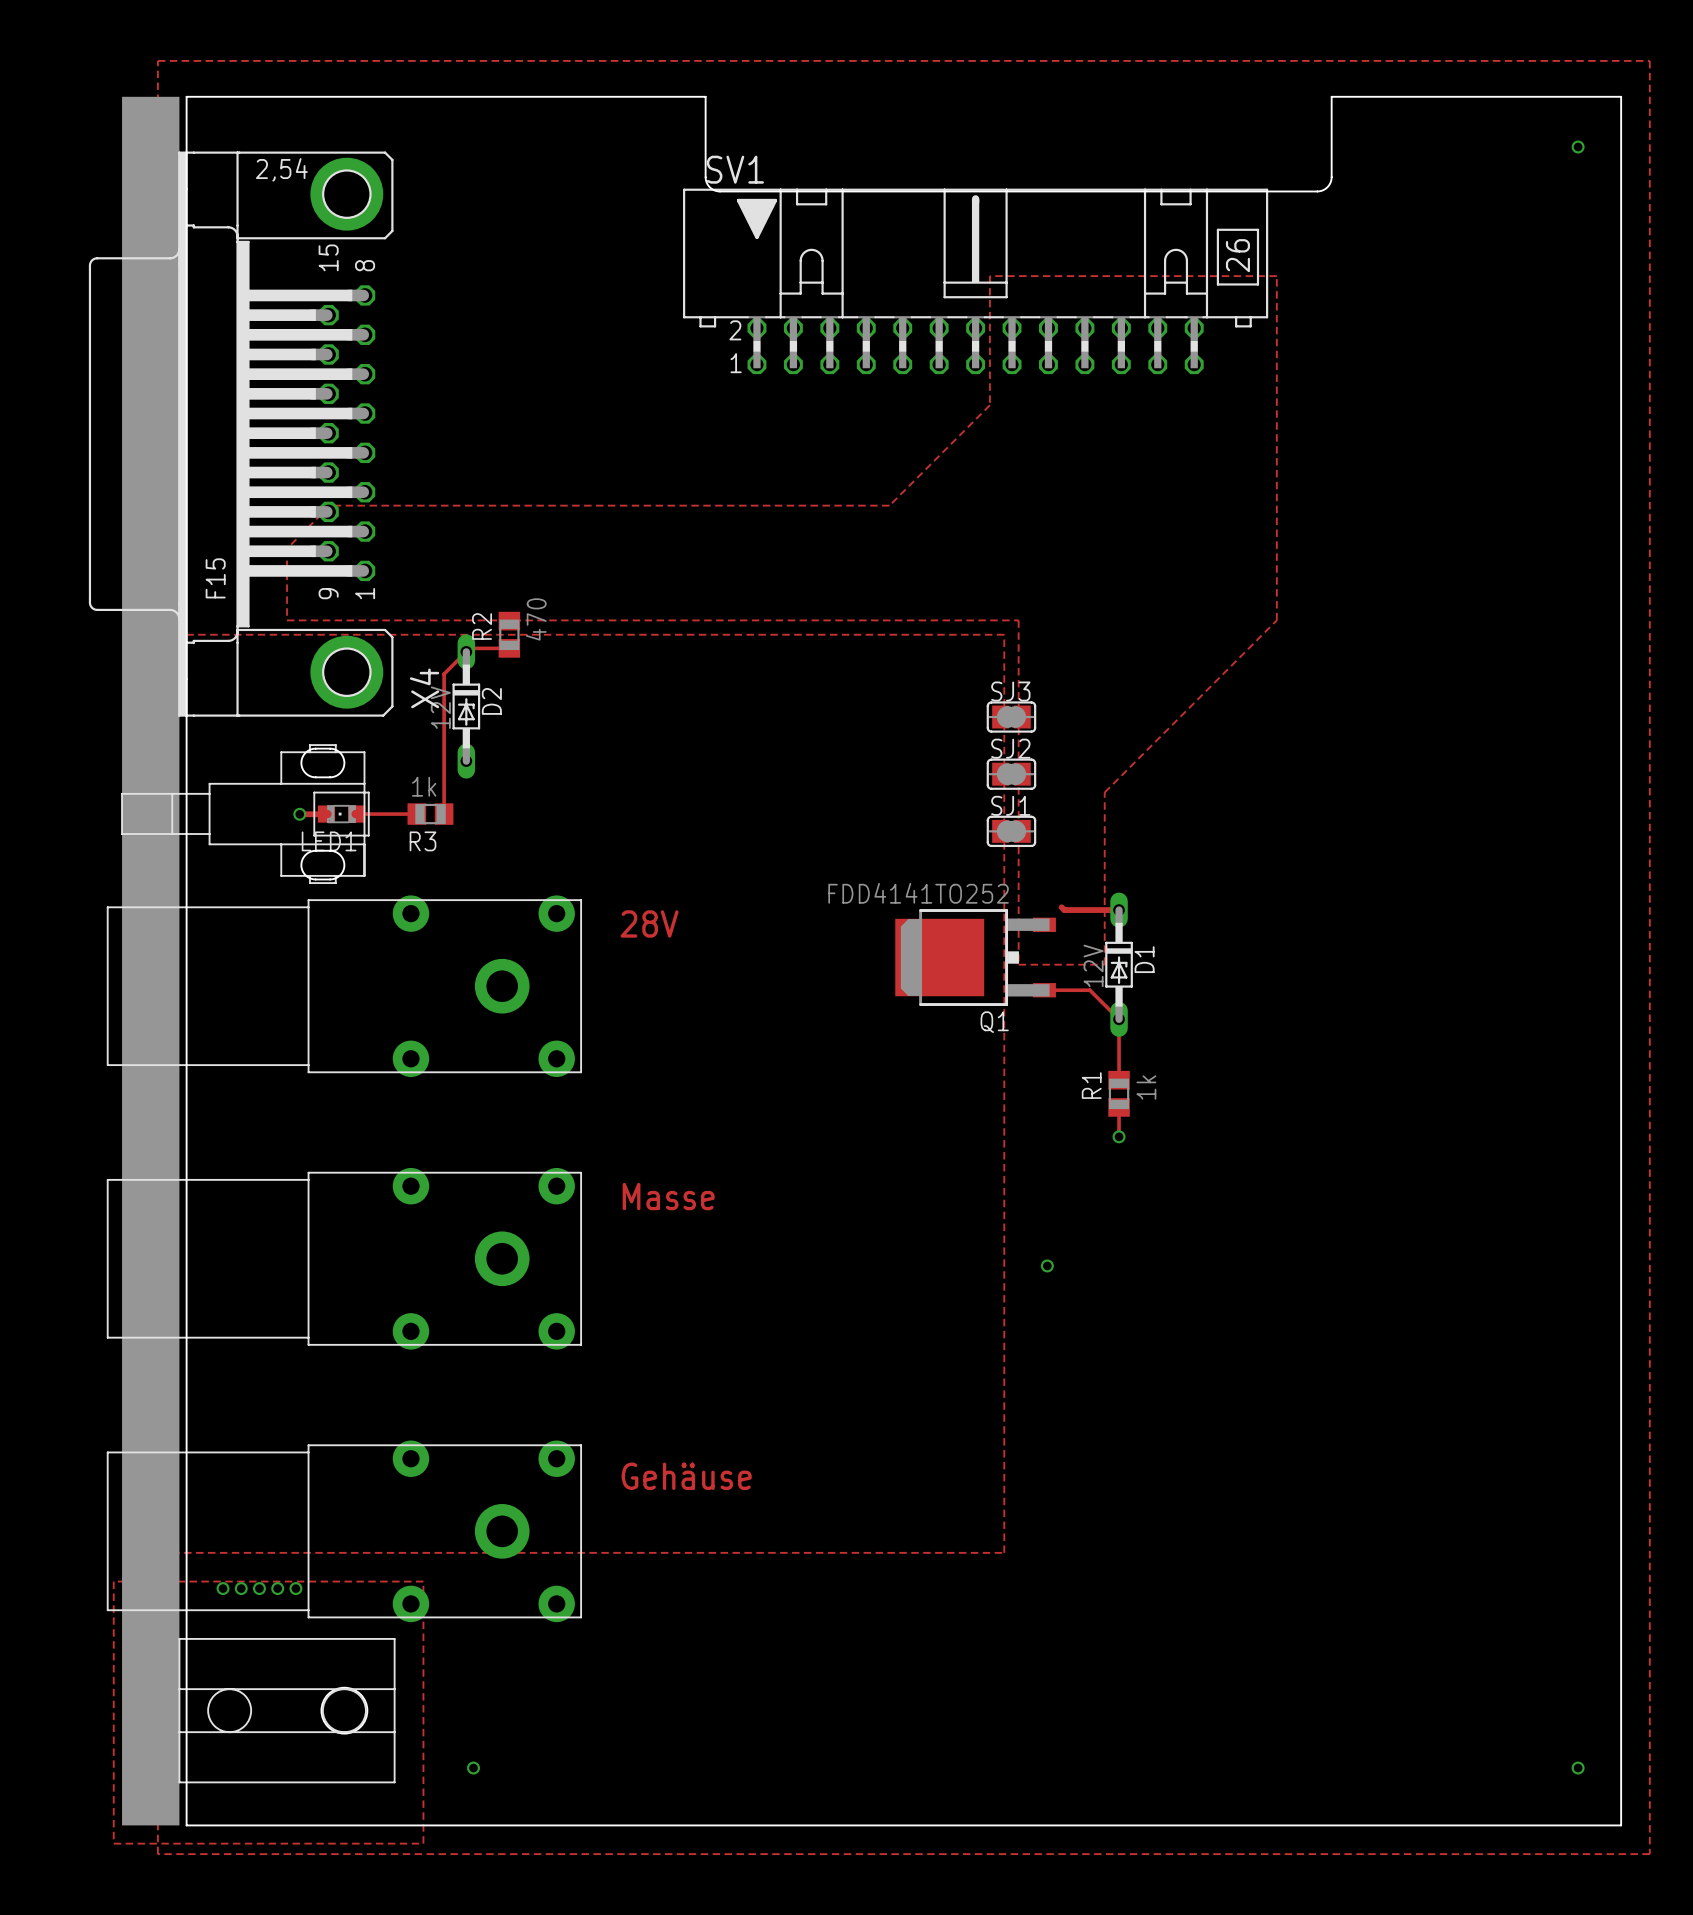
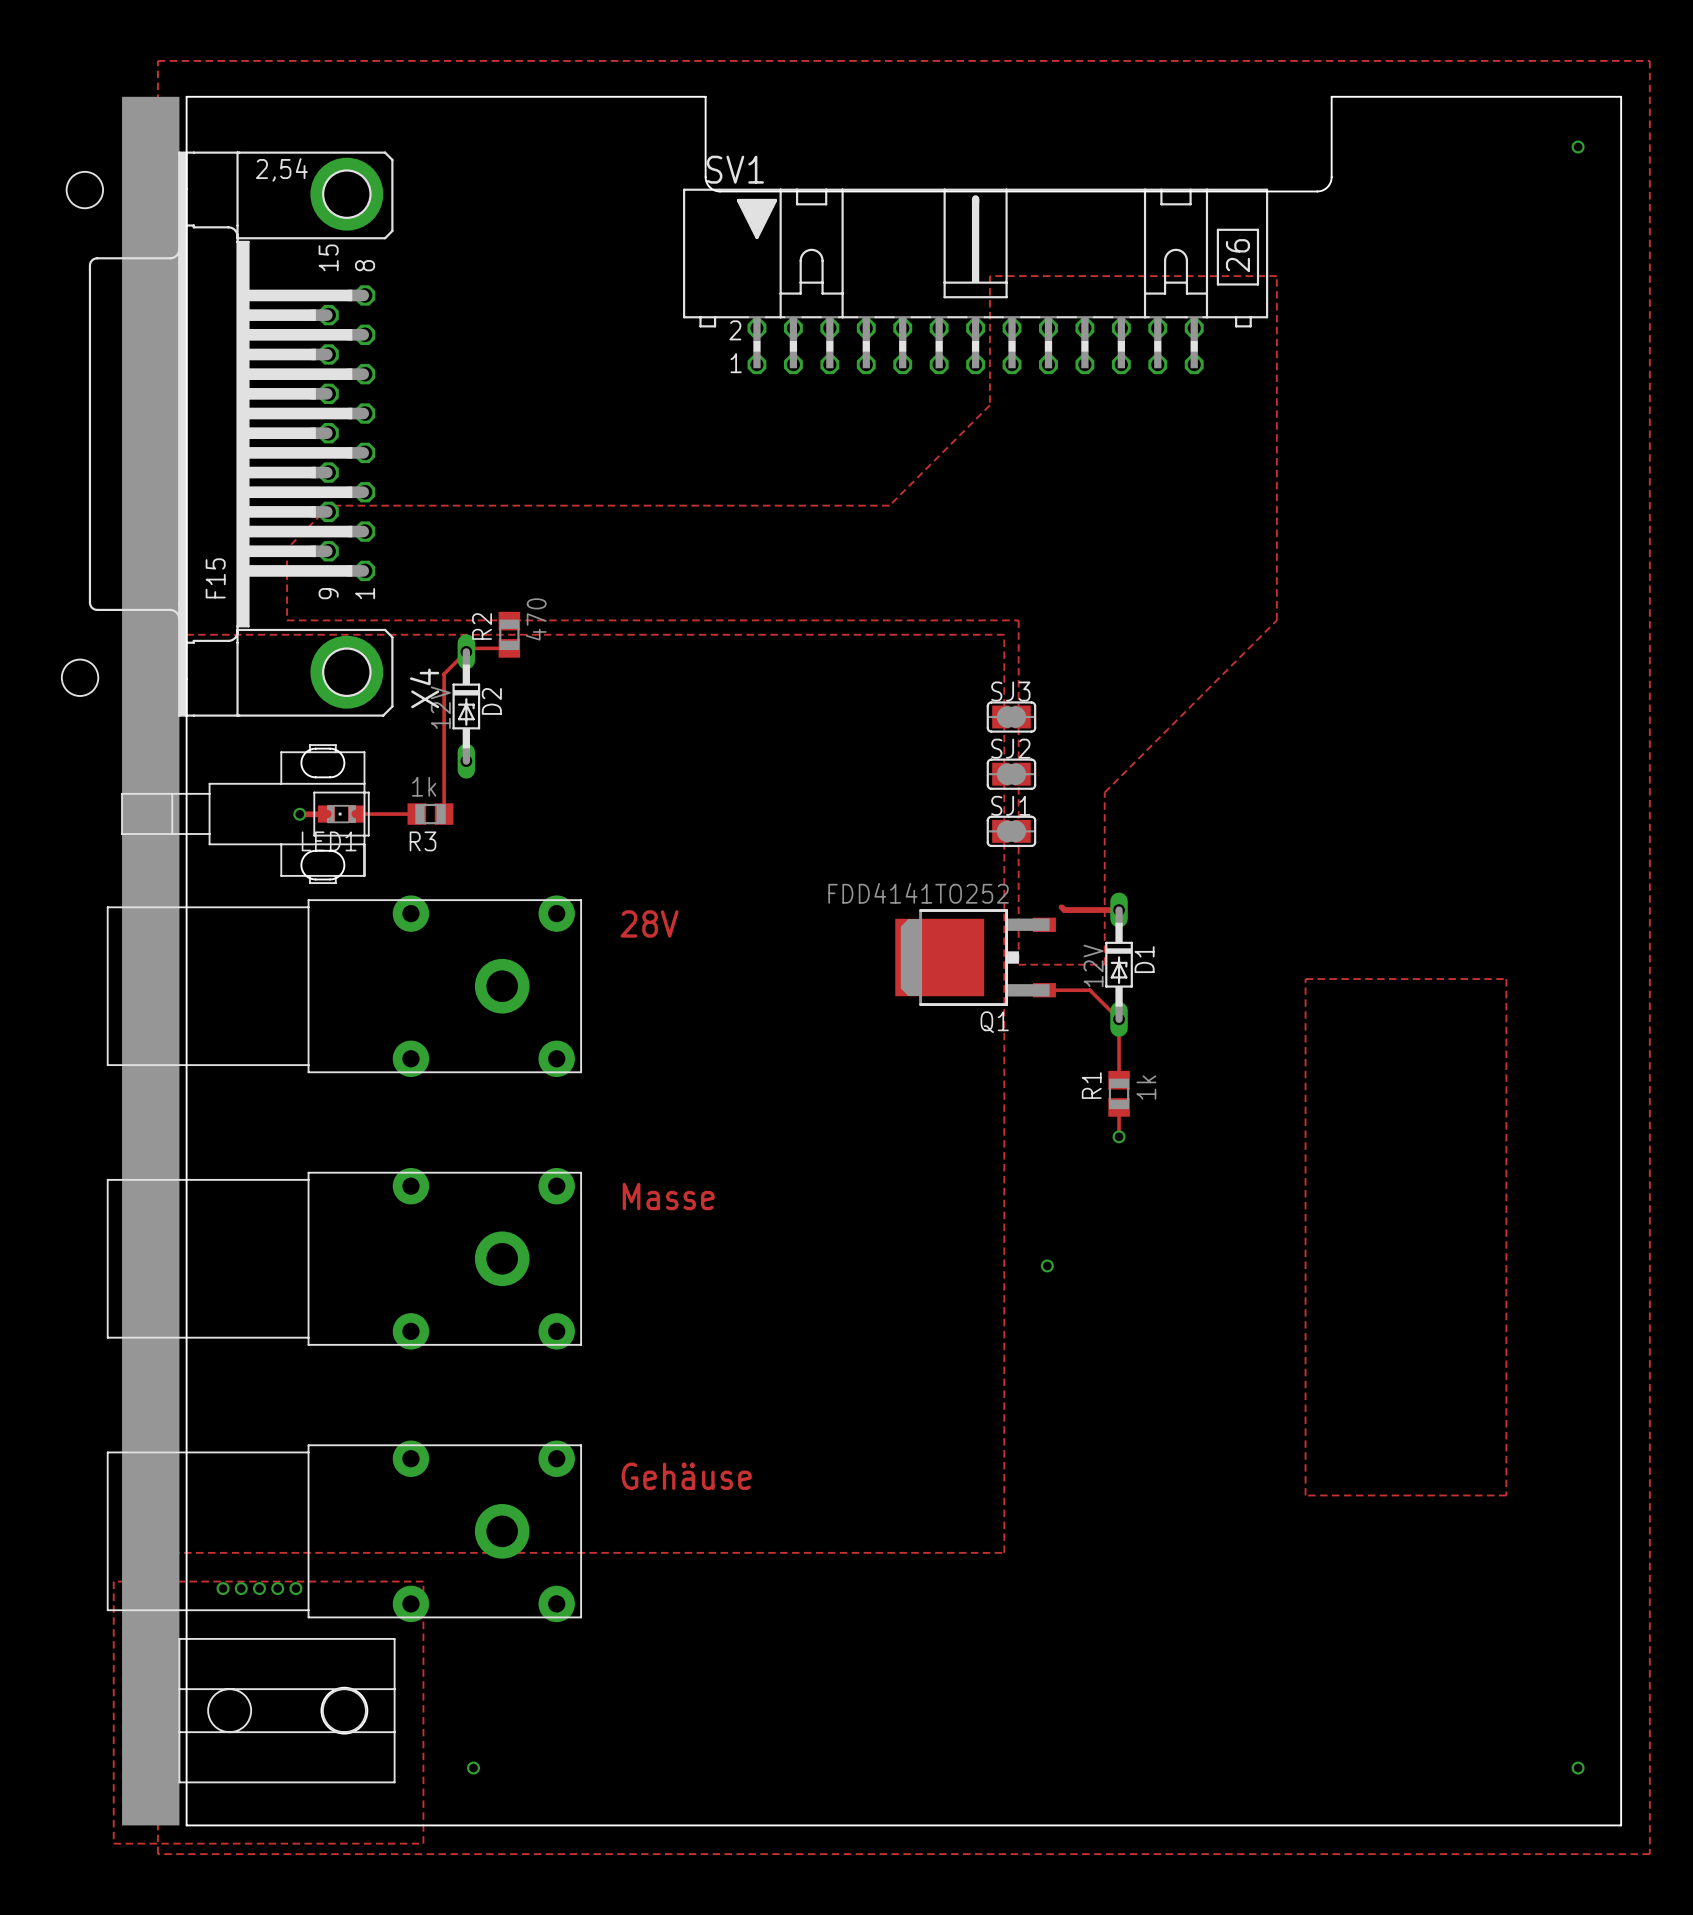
drawing: none -> [65, 170, 104, 210]
drawing: none -> [60, 658, 100, 697]
zone outline: none -> (1305, 979) (1506, 979) (1506, 1495) (1305, 1495) (1305, 979)

